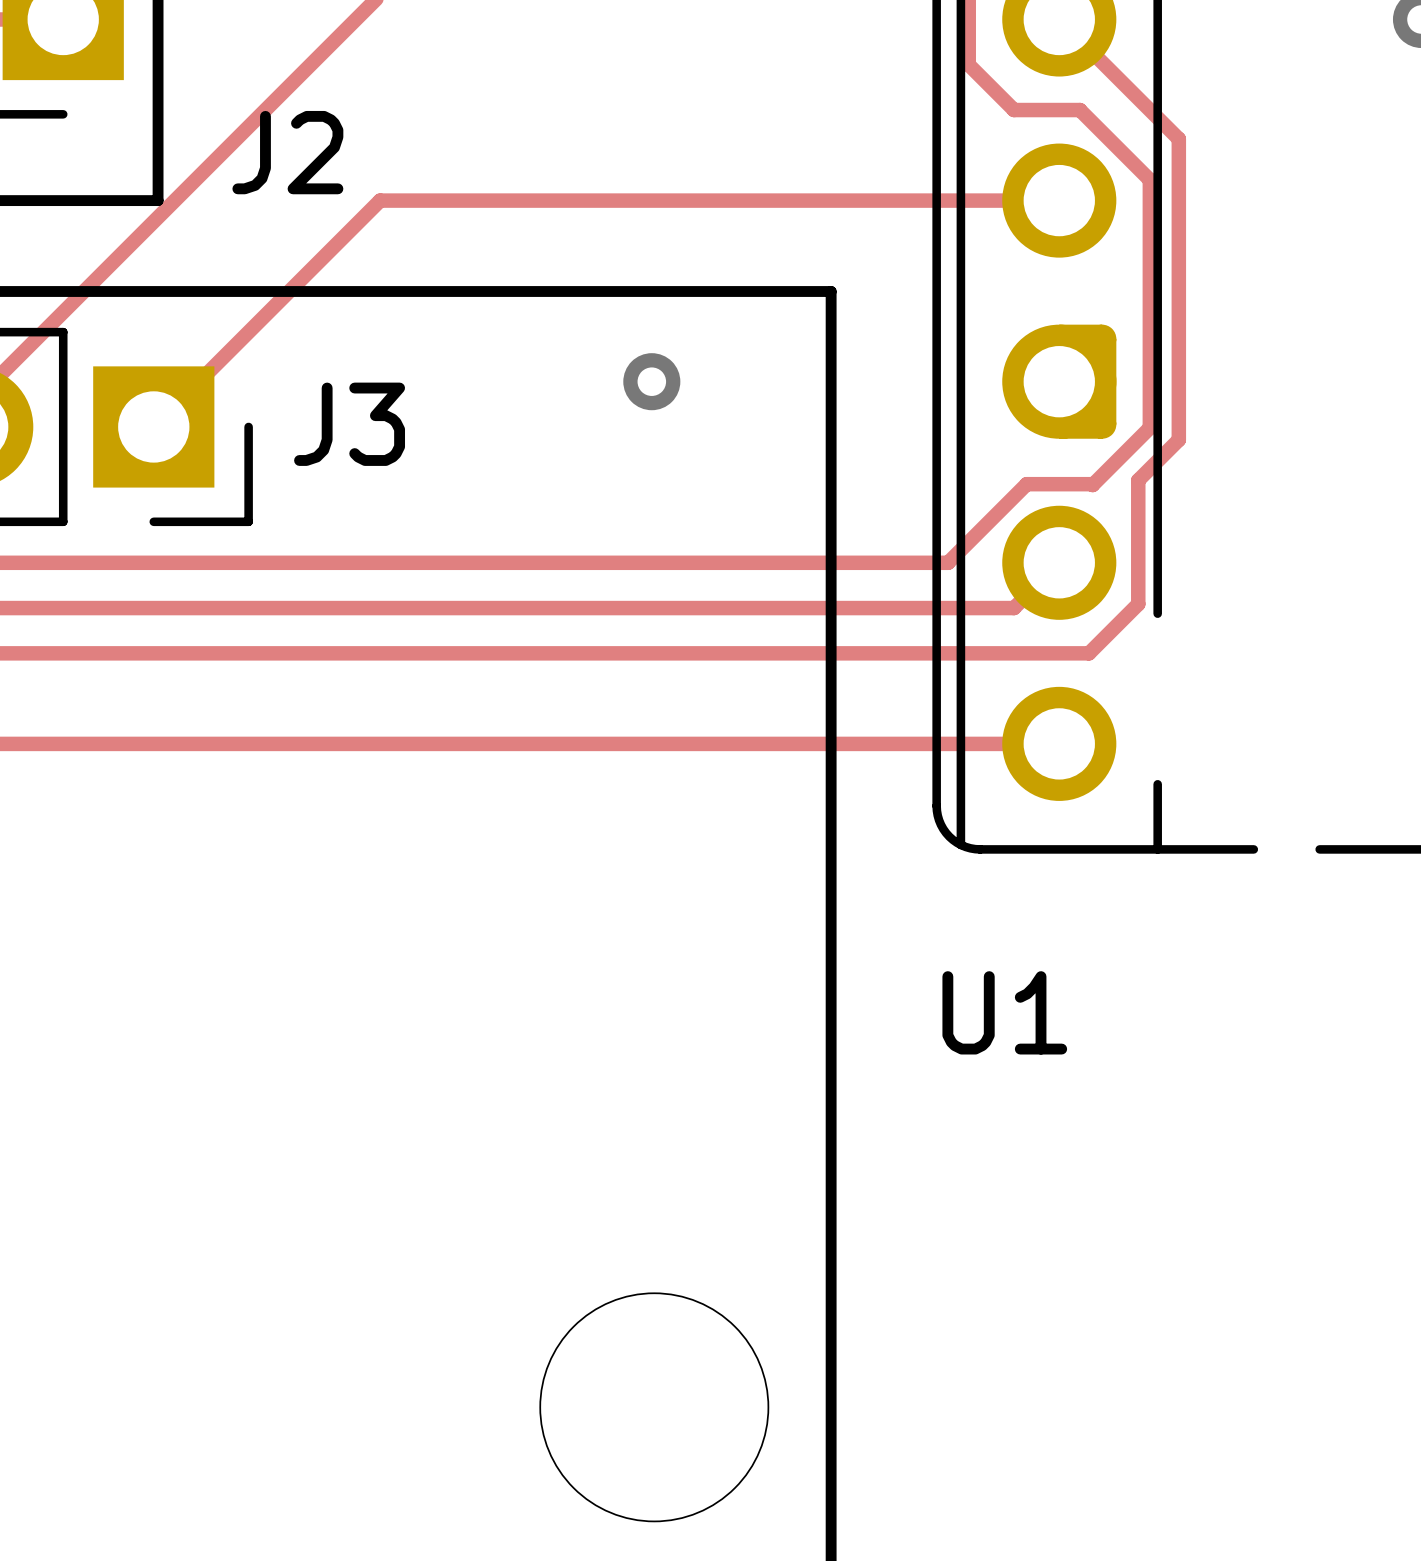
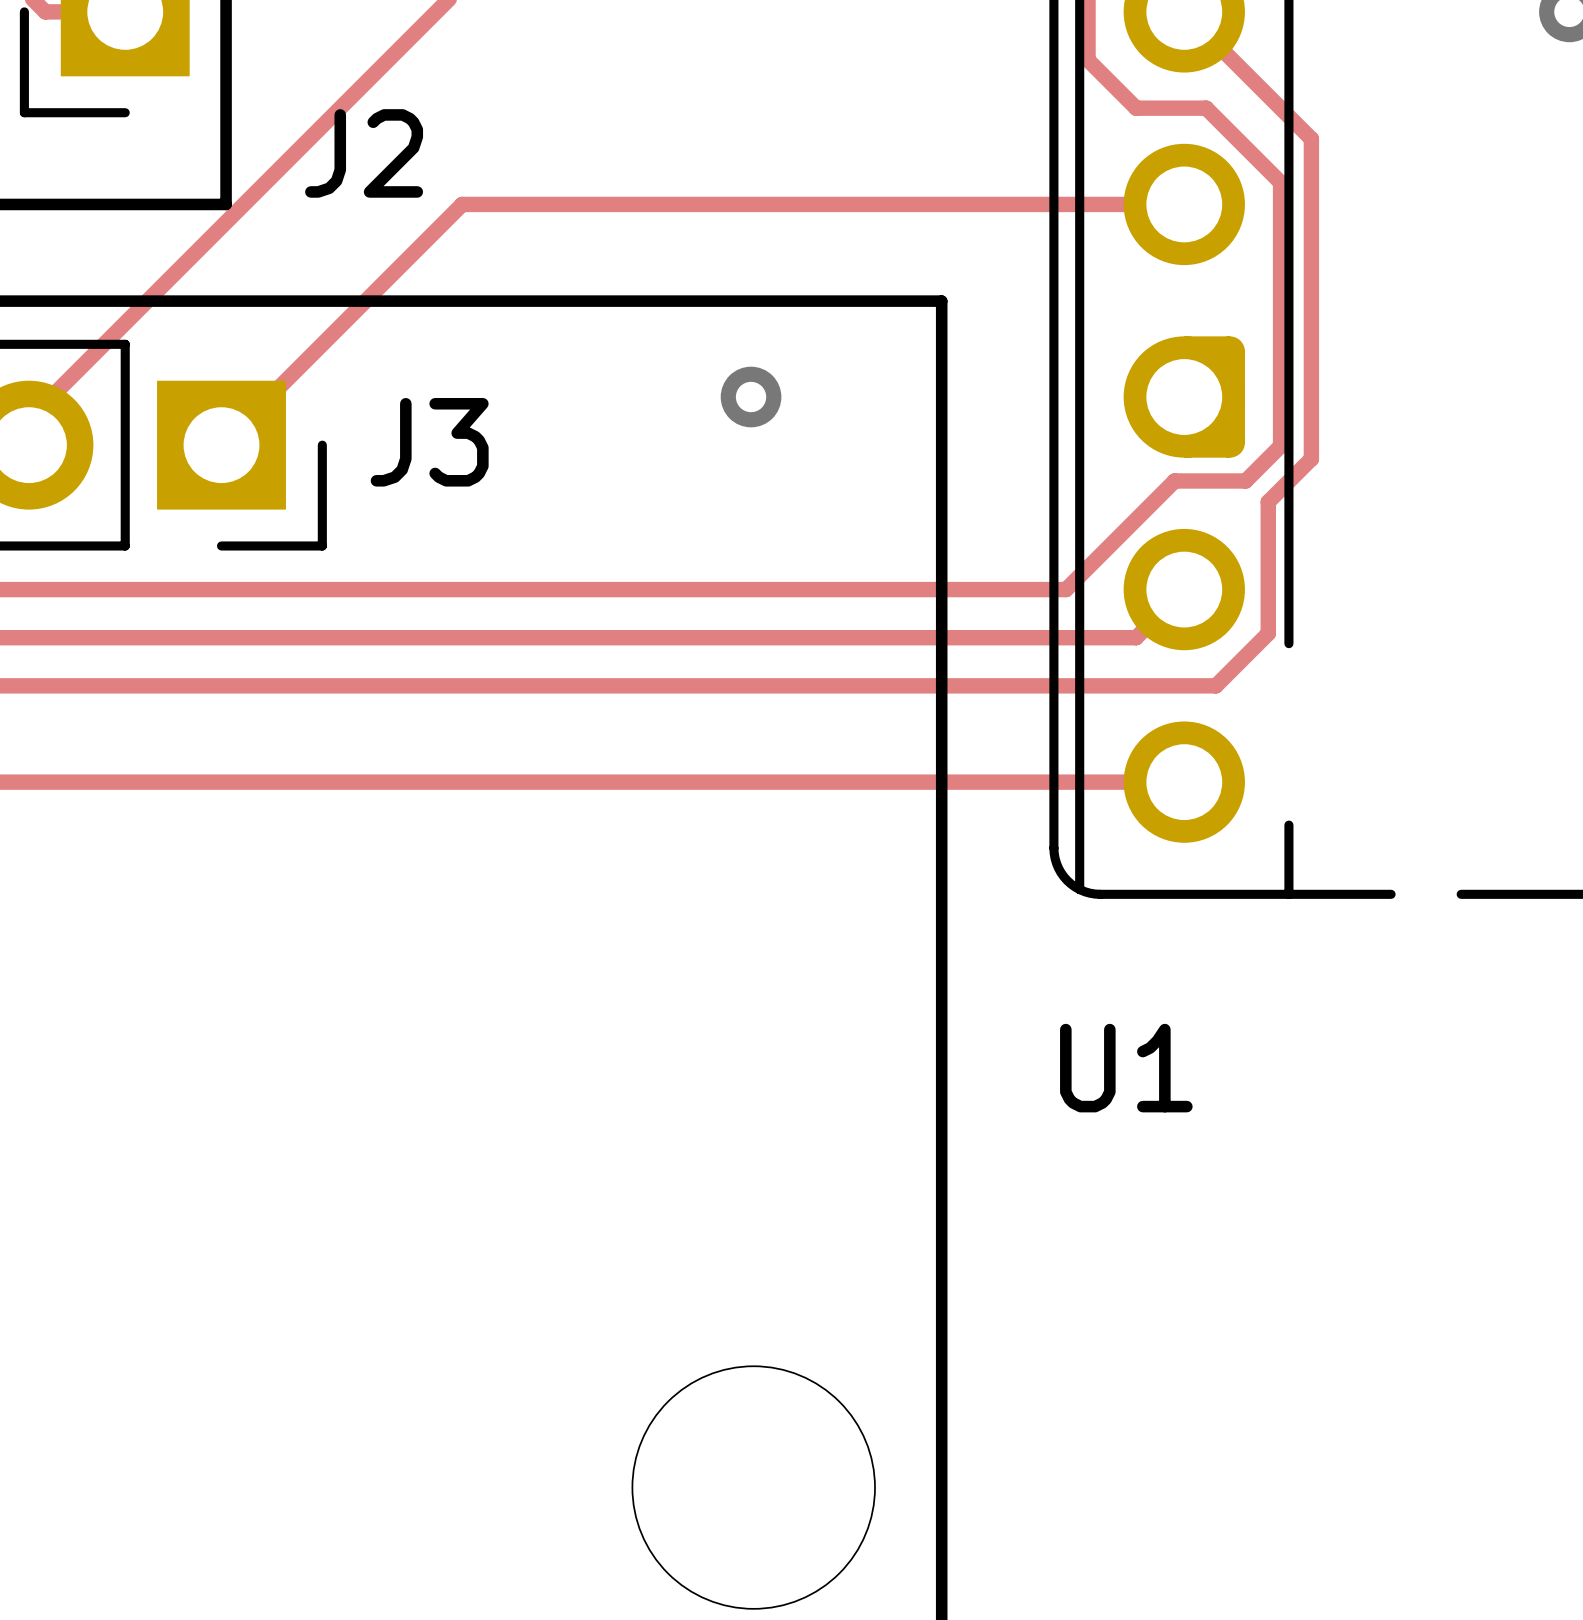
top track: (1117, 460) (1092, 485) -> none
top track: (1026, 484) (1091, 484) -> (1149, 505) (1174, 480) (1245, 480)

